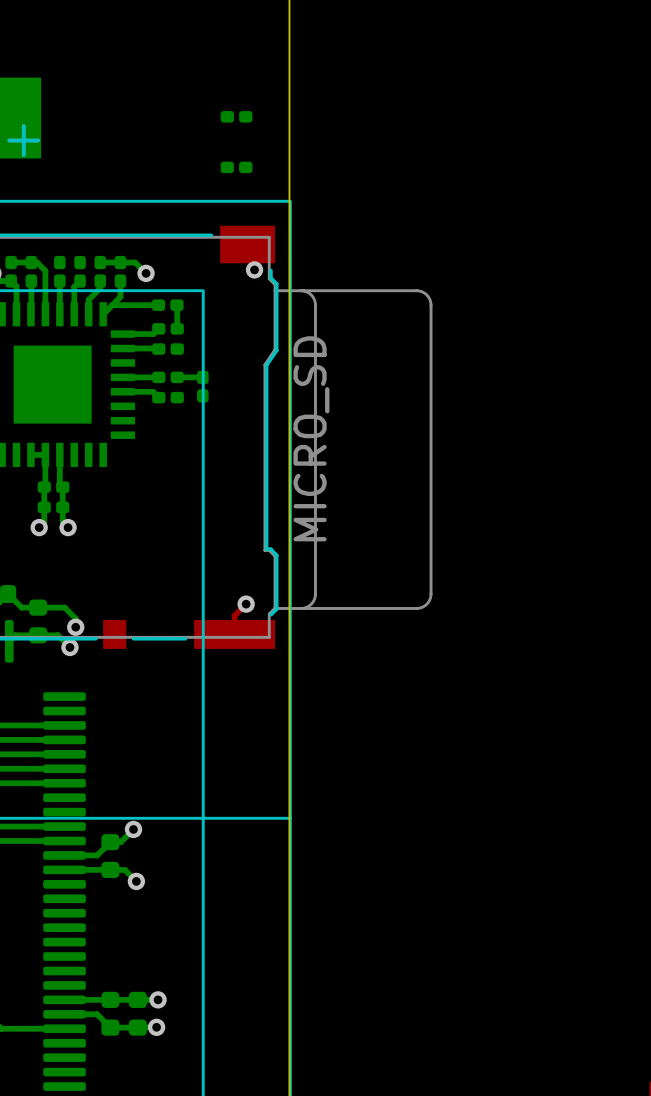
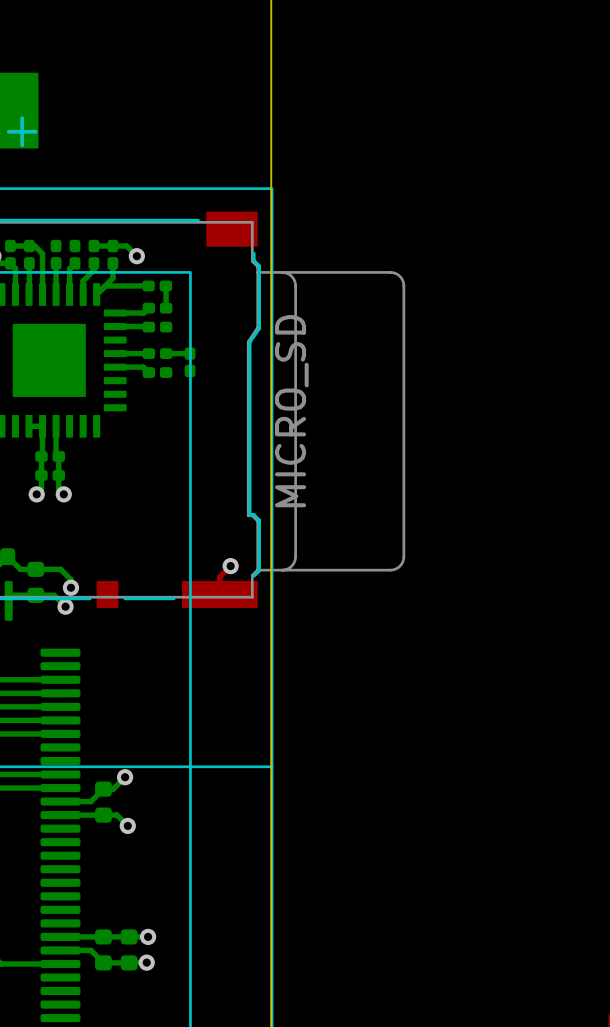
part: (236, 116) -> none
part: (236, 167) -> none
via: (254, 269) -> none

